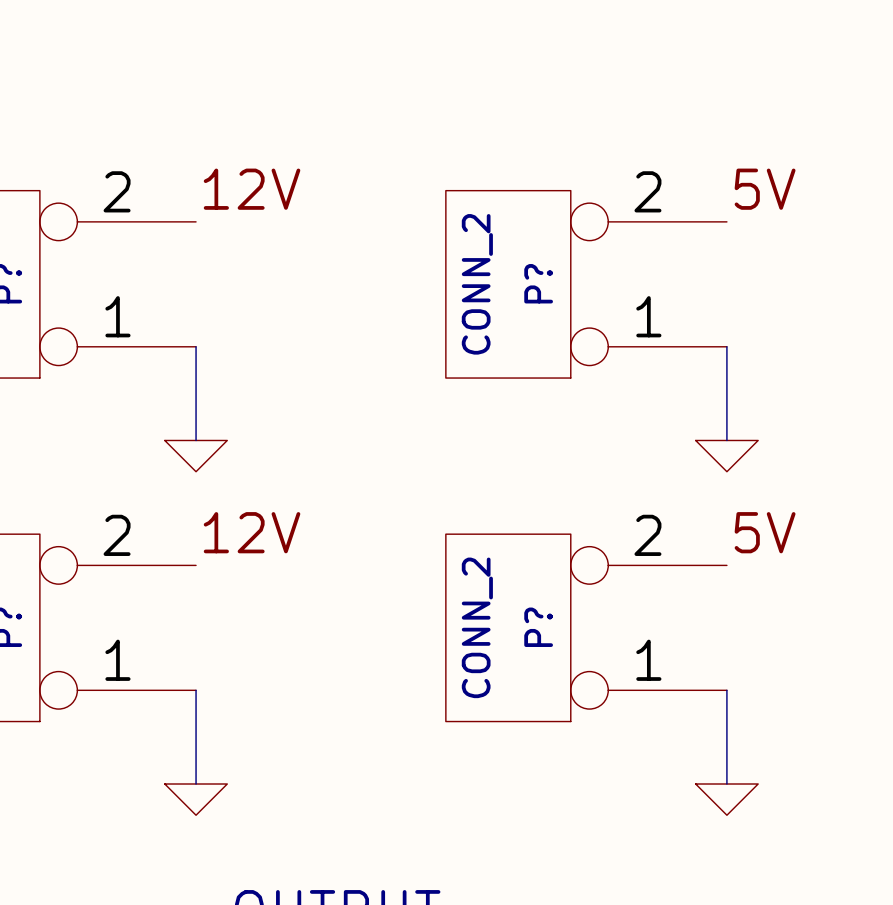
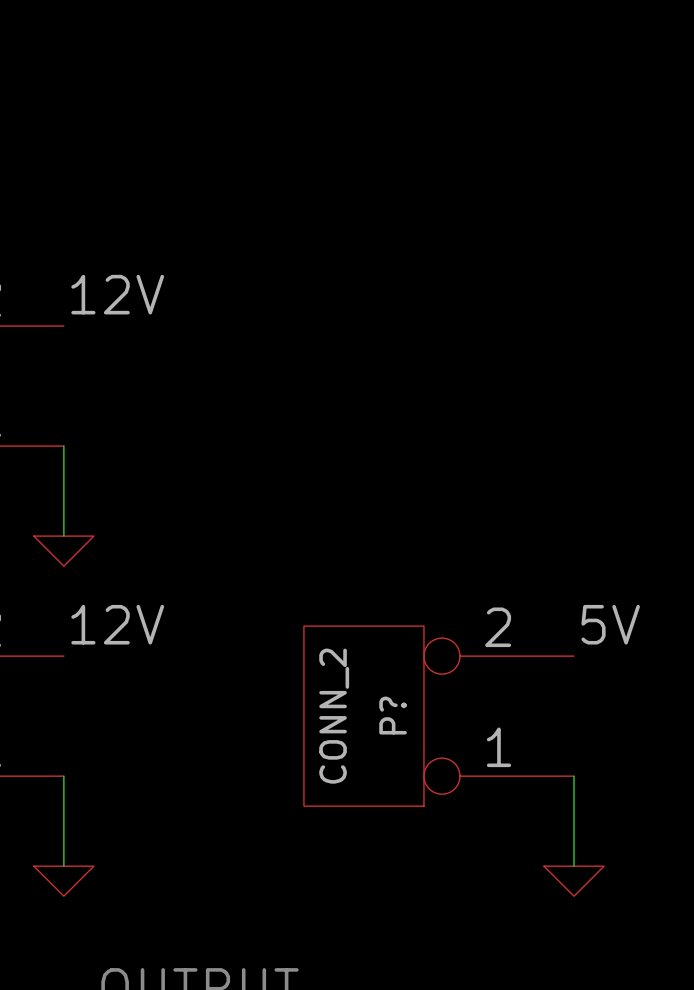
label: 5V (765, 189) -> none
P?: CONN_2 (586, 284) -> none
wire: (726, 346) (726, 440) -> none
power symbol: (726, 456) -> none

